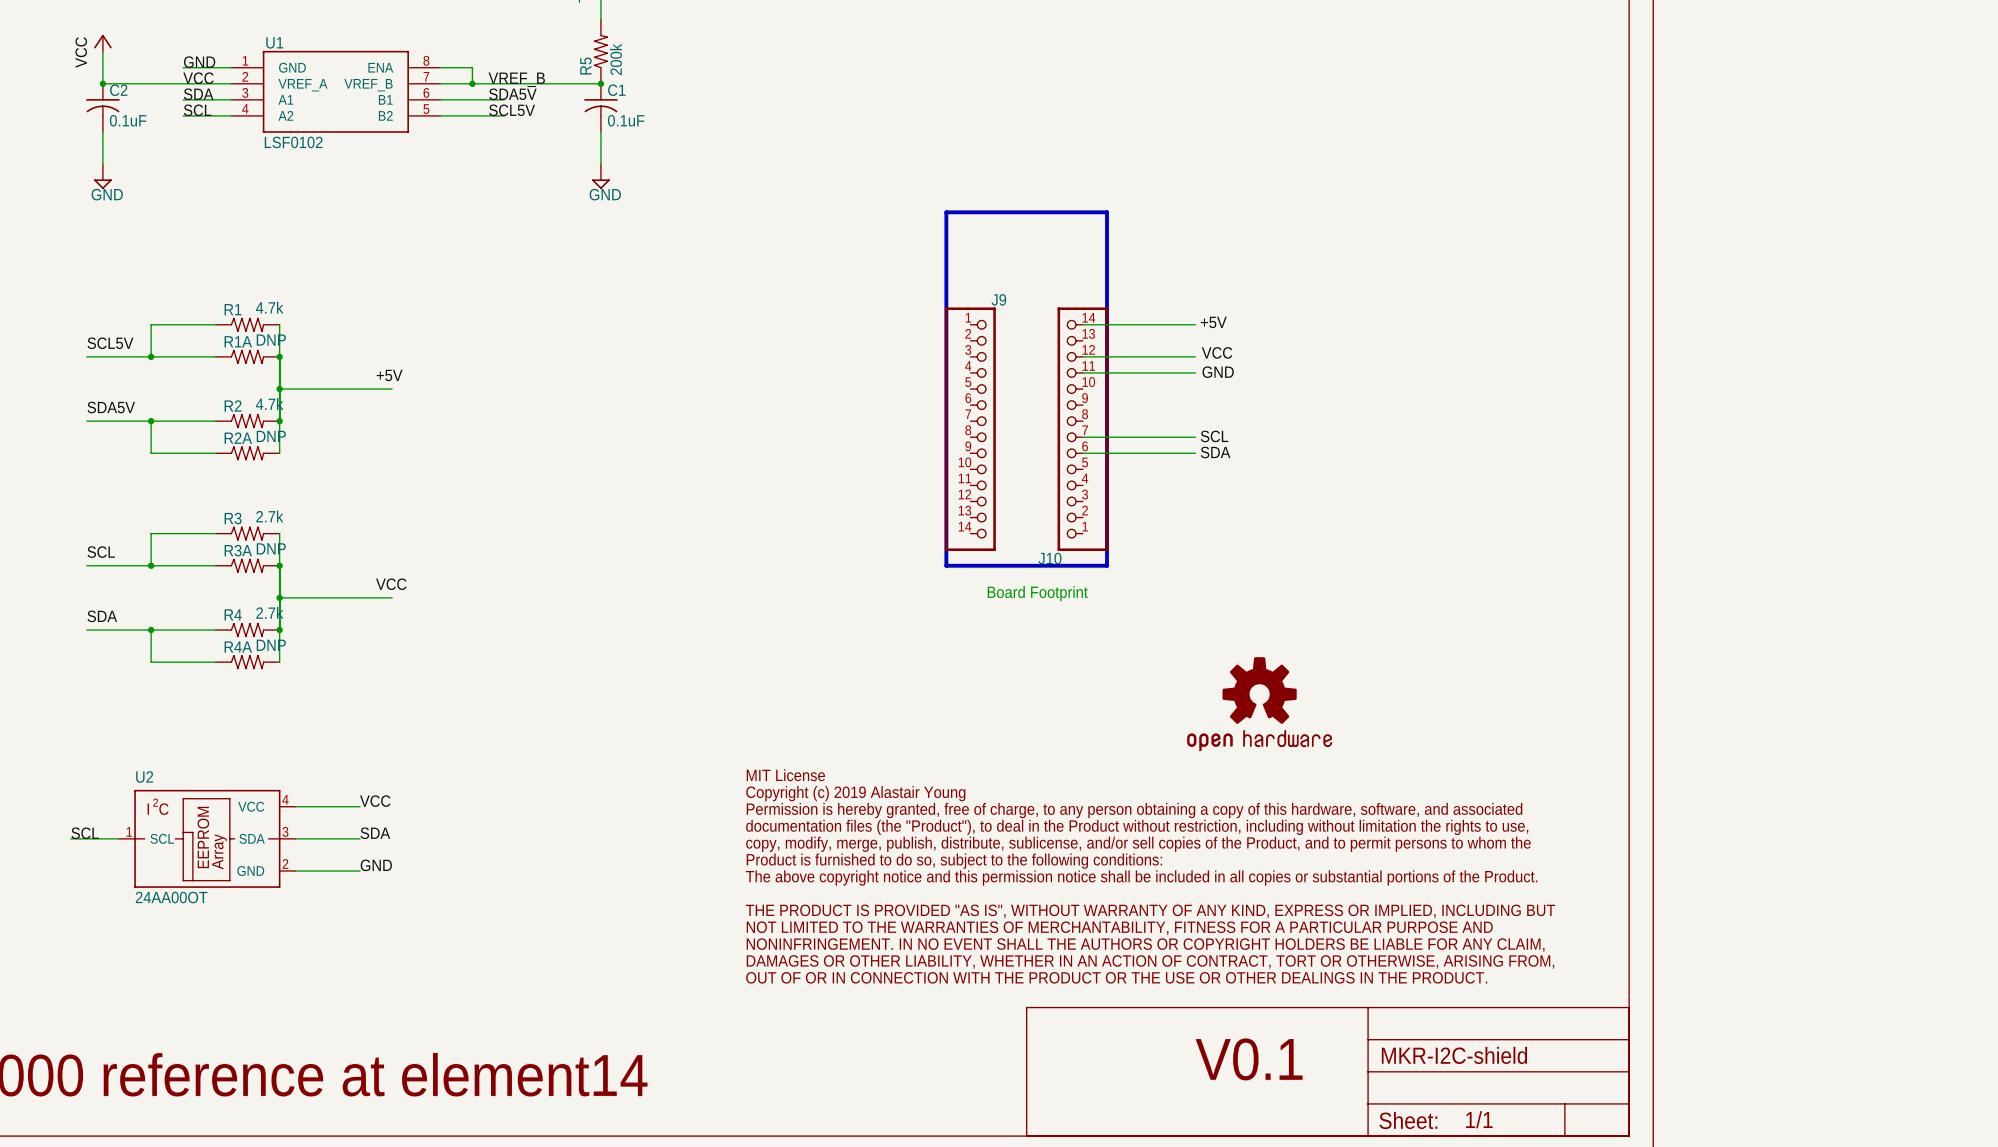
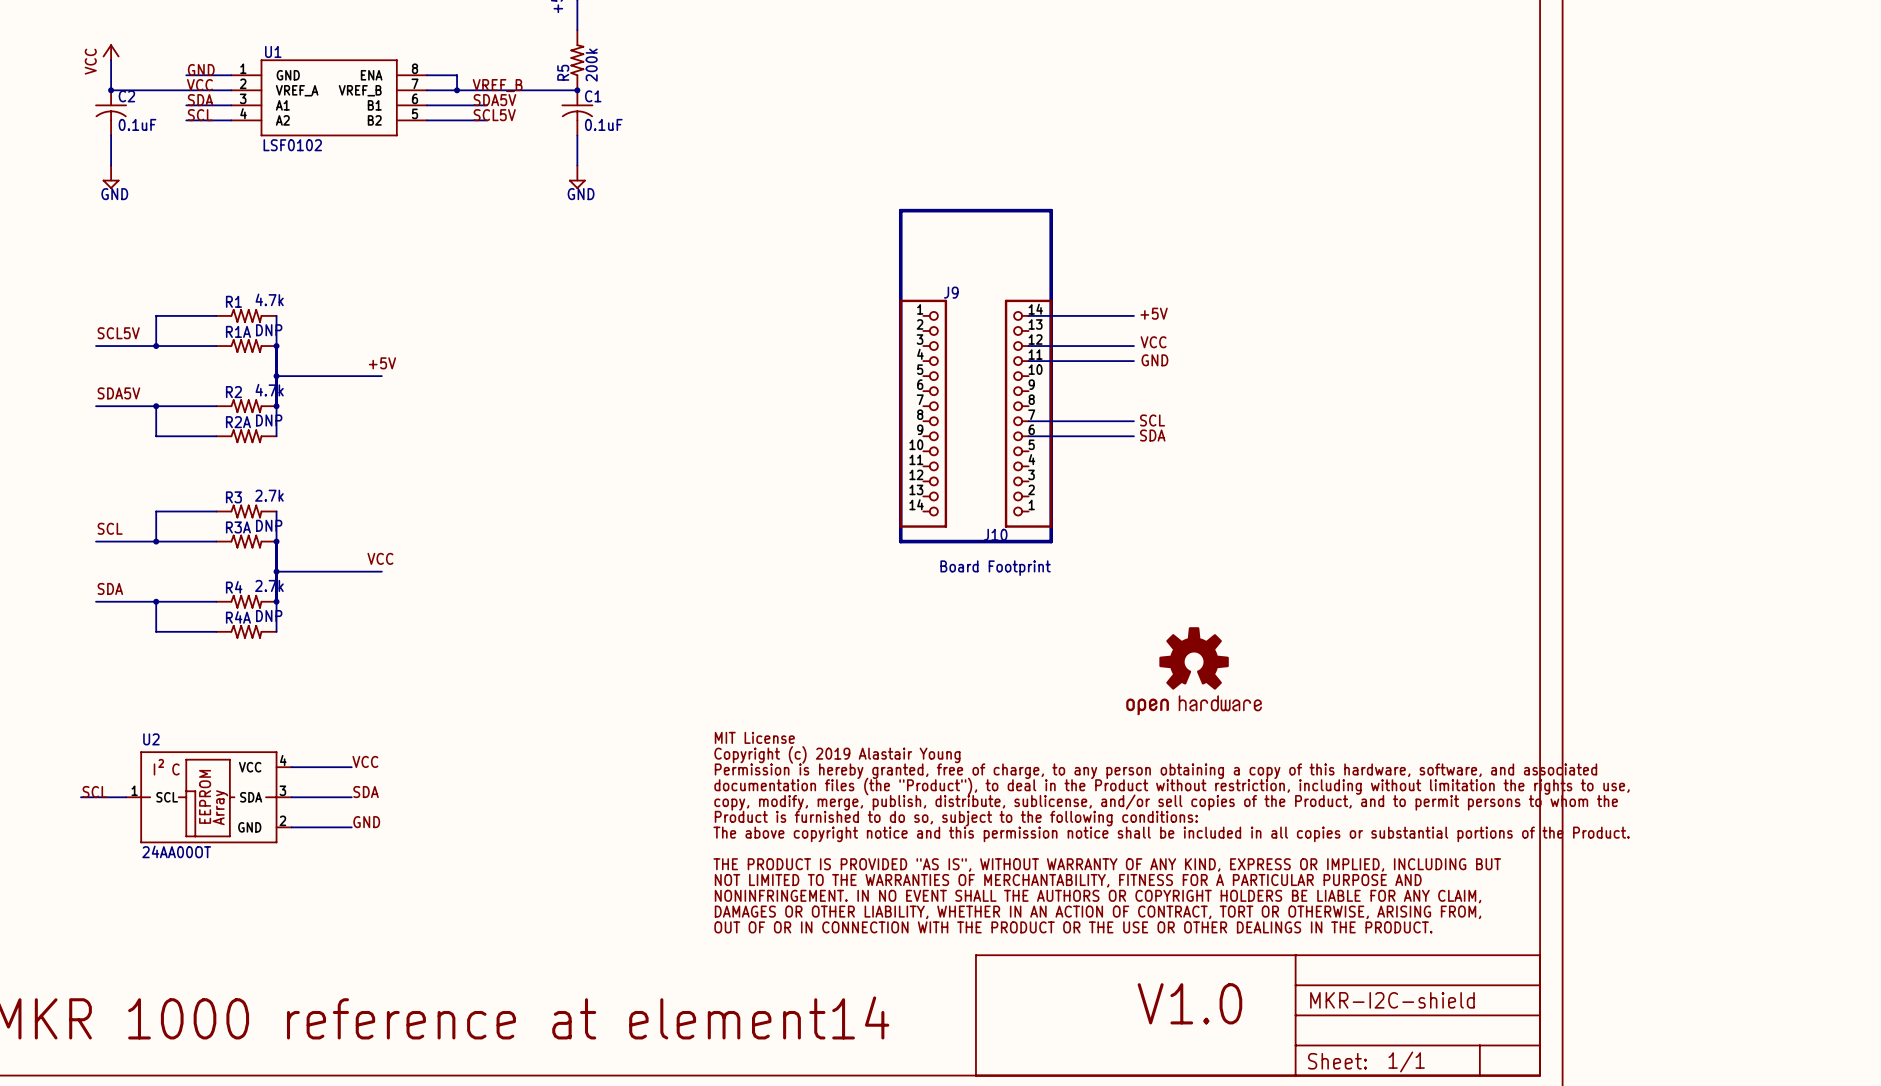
text: V0.1 (1249, 1059) -> V1.0 (1189, 1003)

